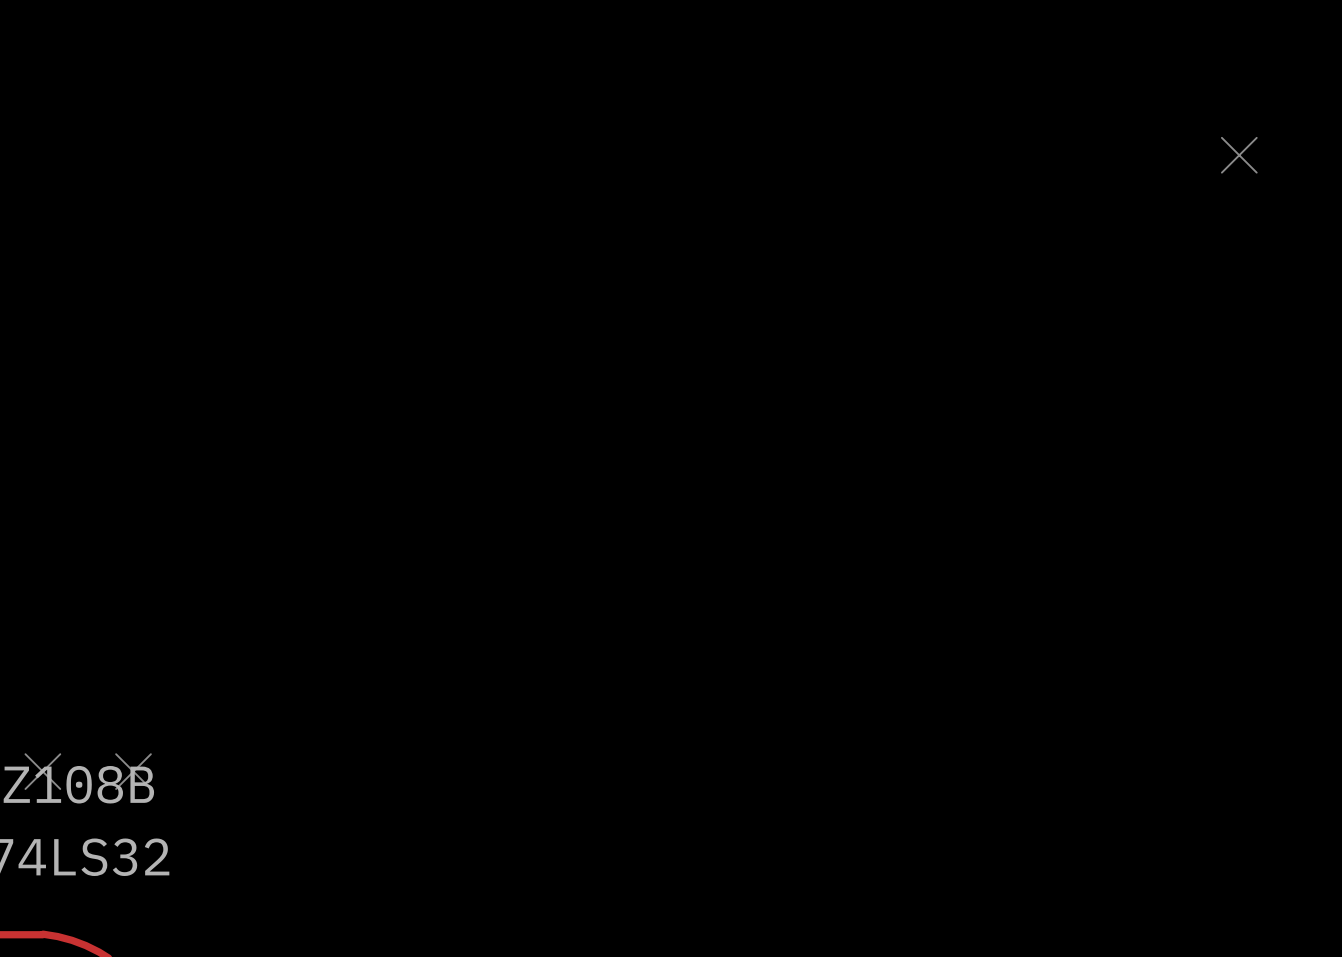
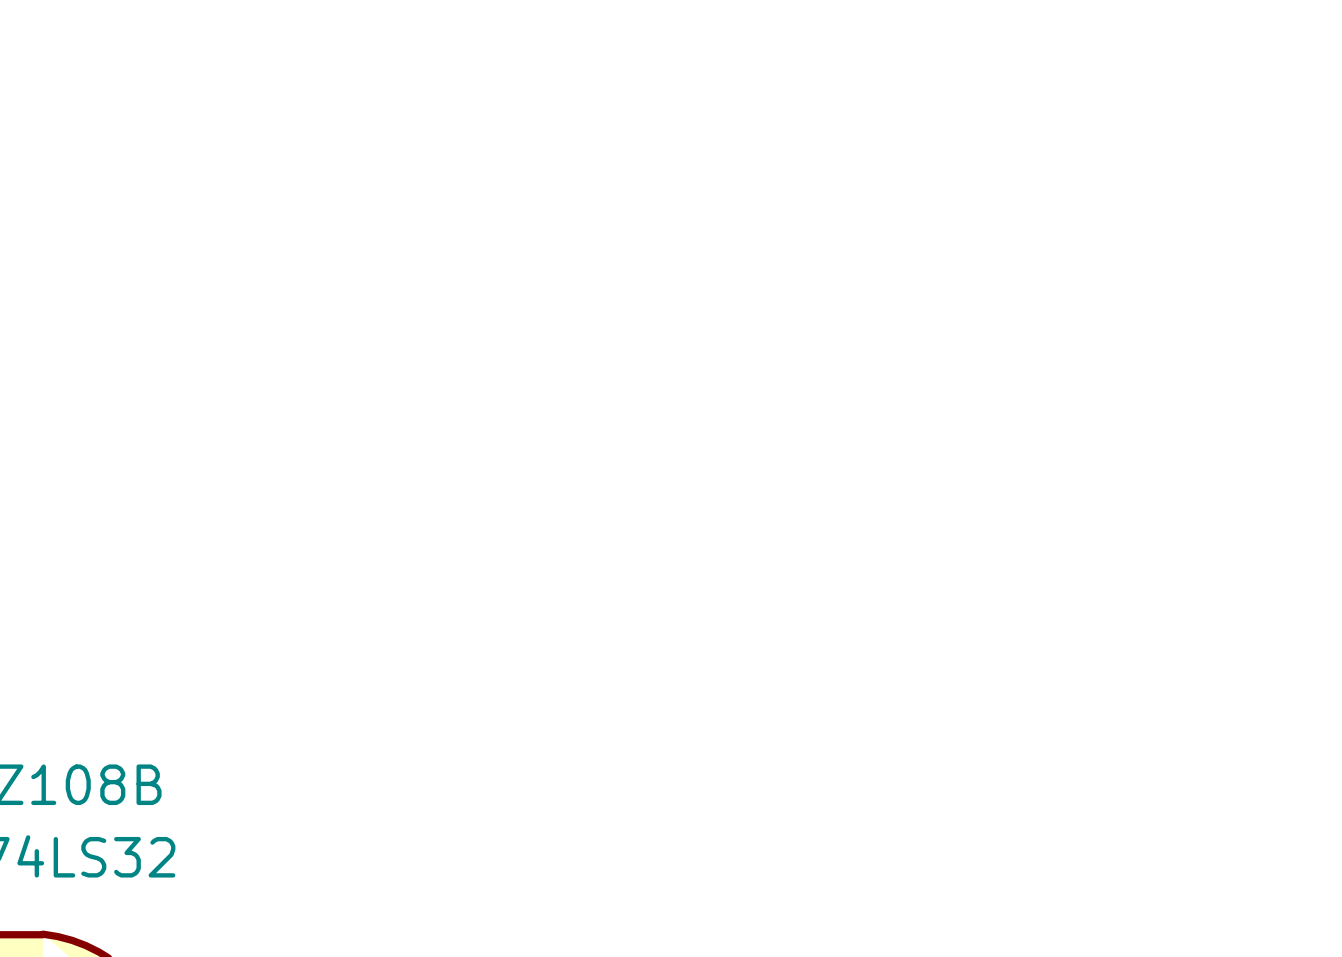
no-connect mark: (1239, 155) -> none
no-connect mark: (42, 771) -> none
no-connect mark: (133, 771) -> none

